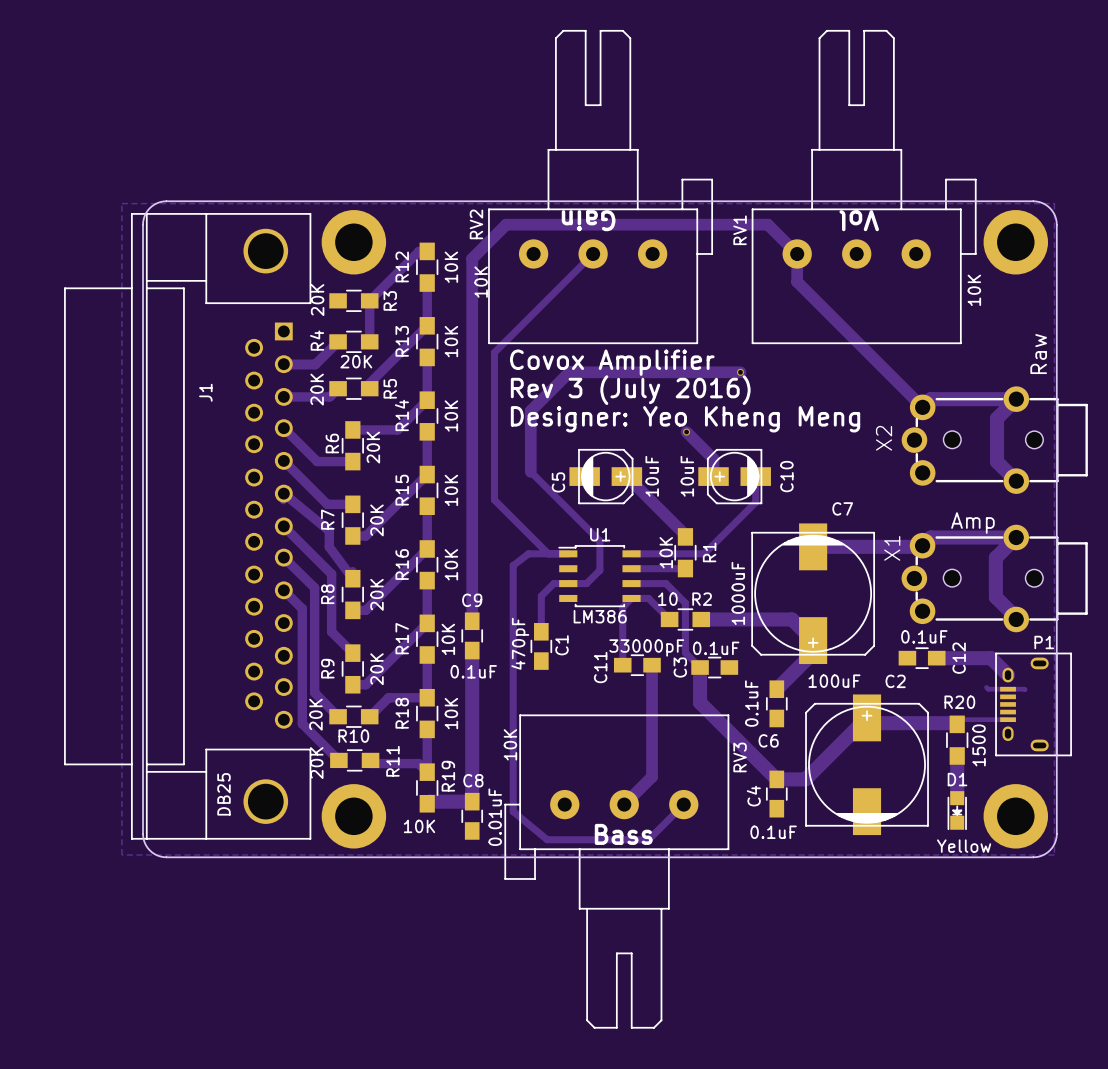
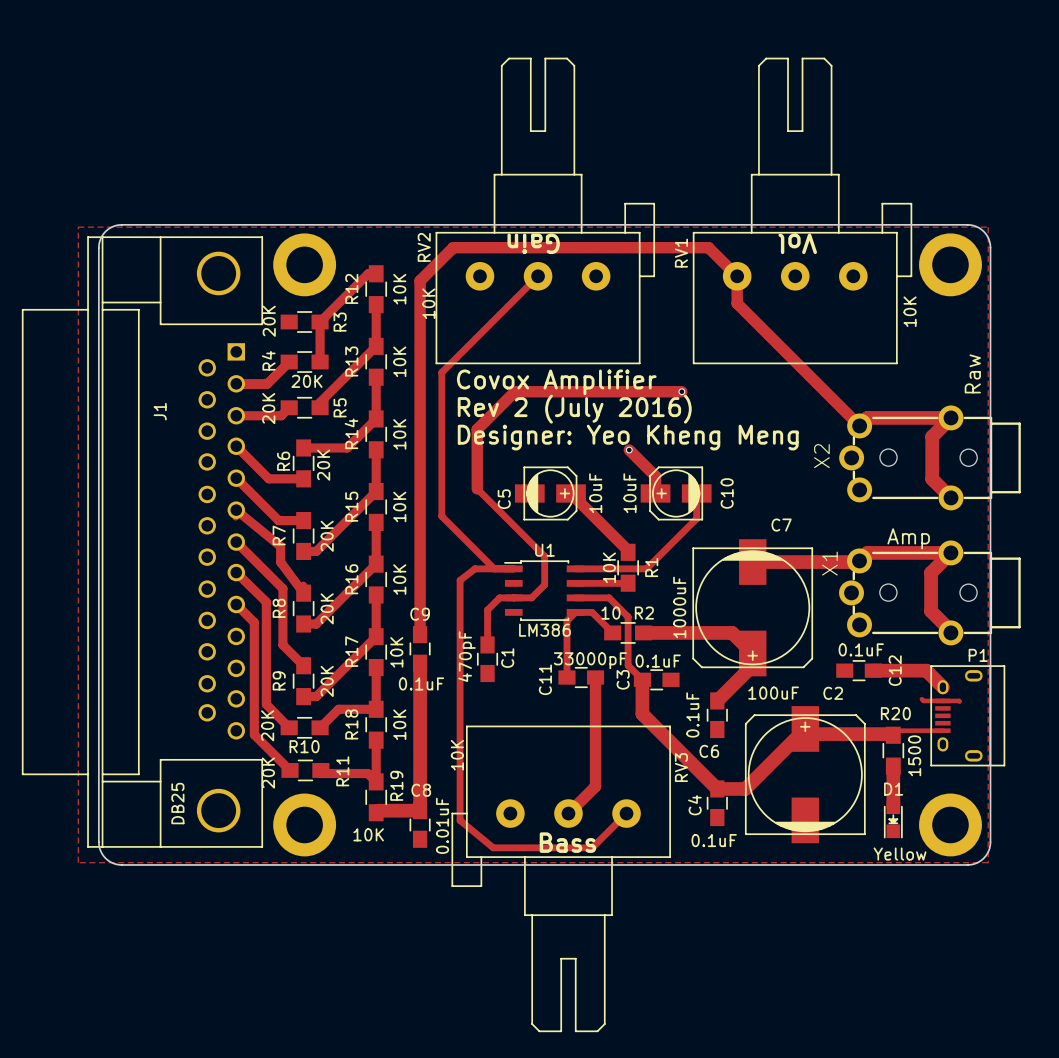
text: Rev 3 (July 2016) (630, 390) -> Rev 2 (July 2016) (574, 409)

